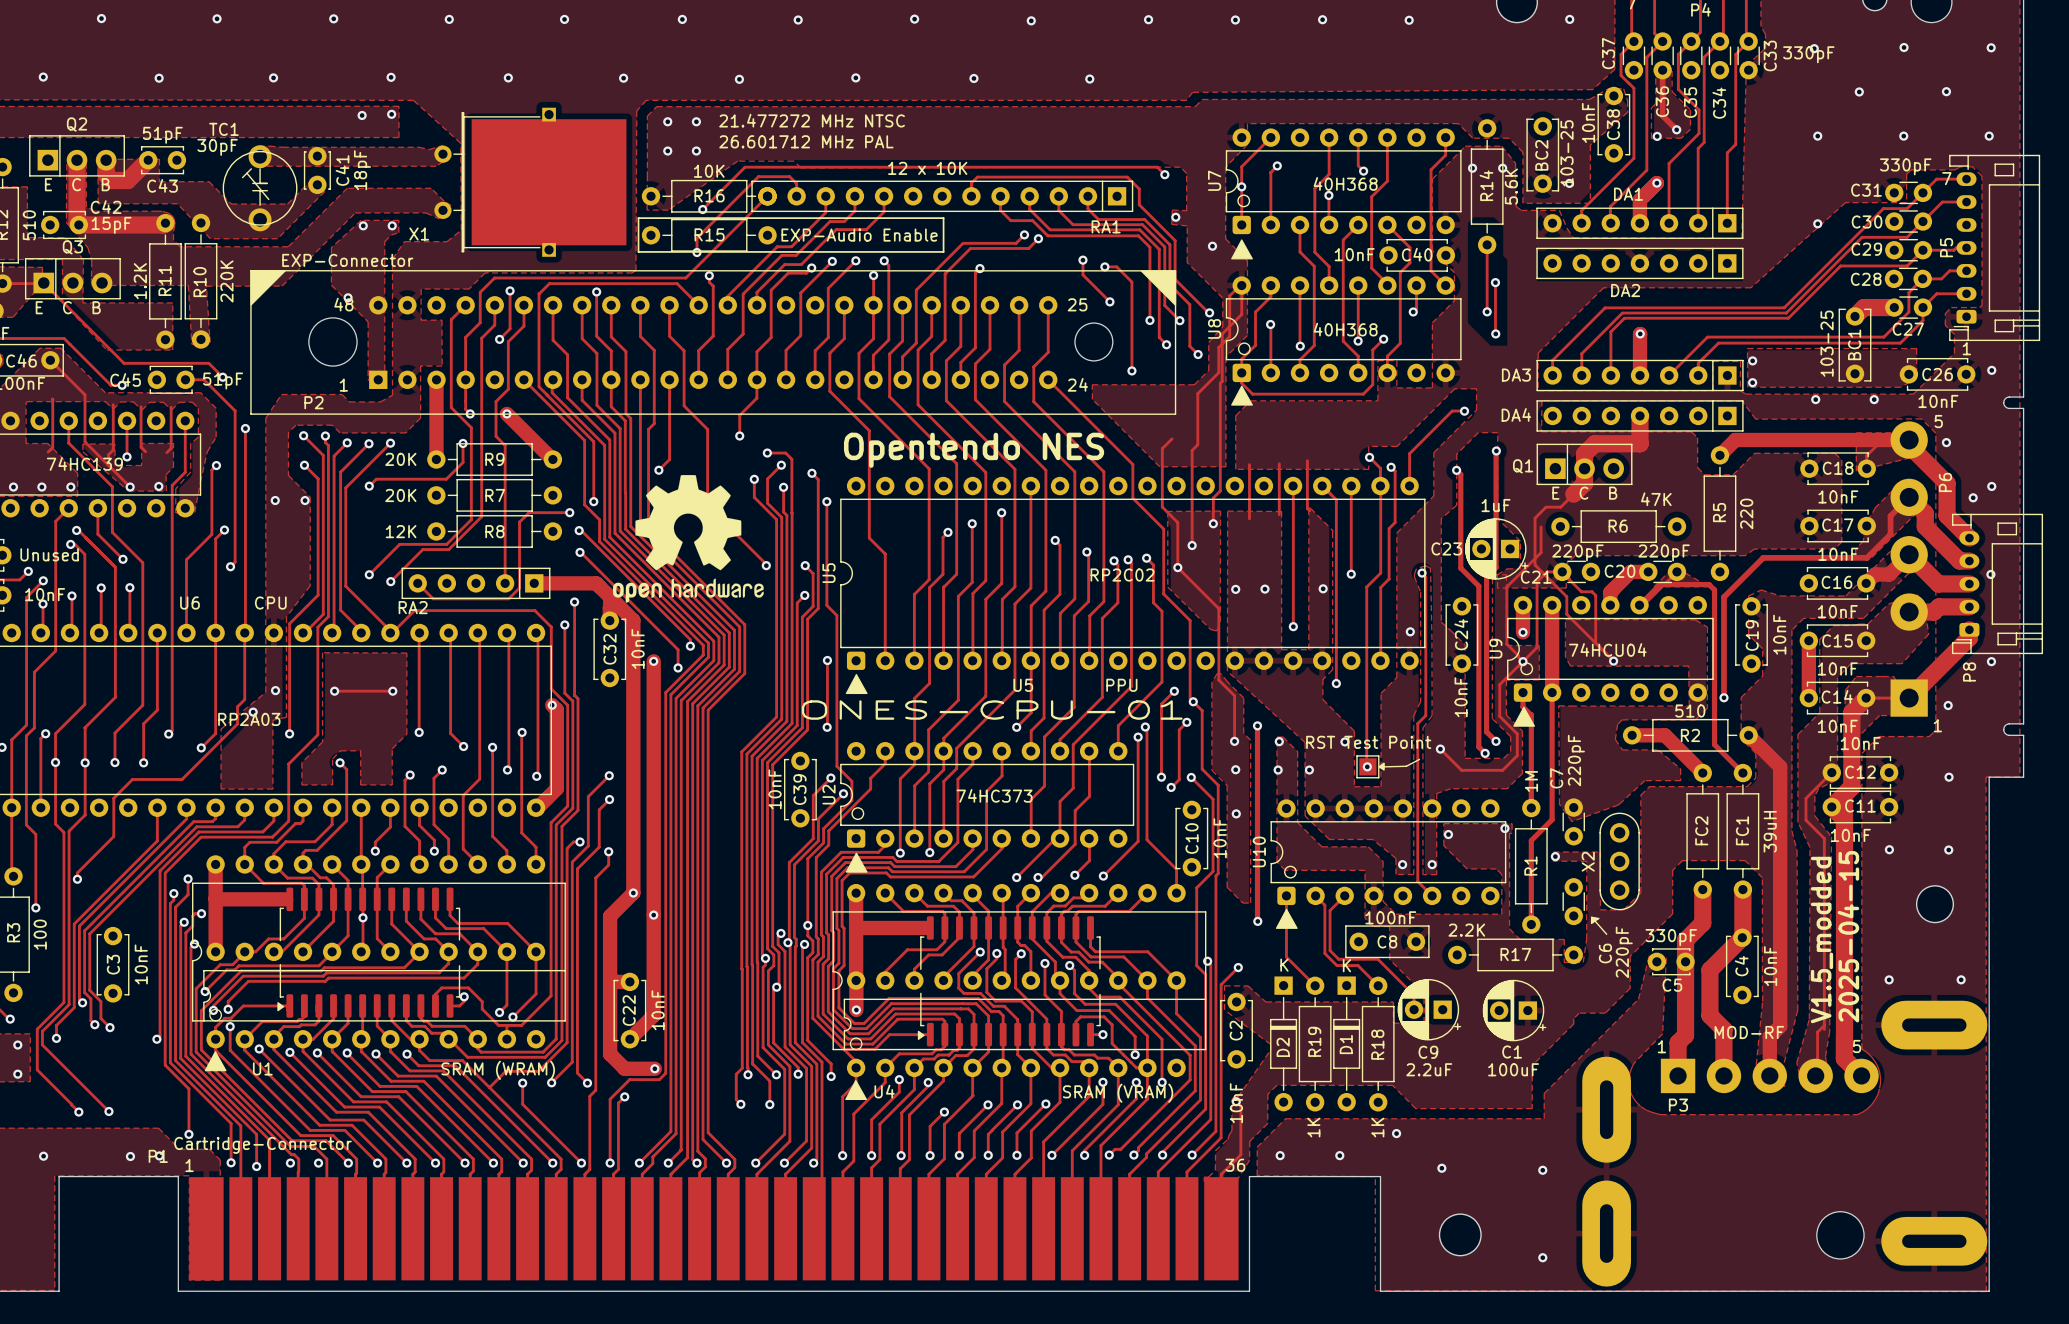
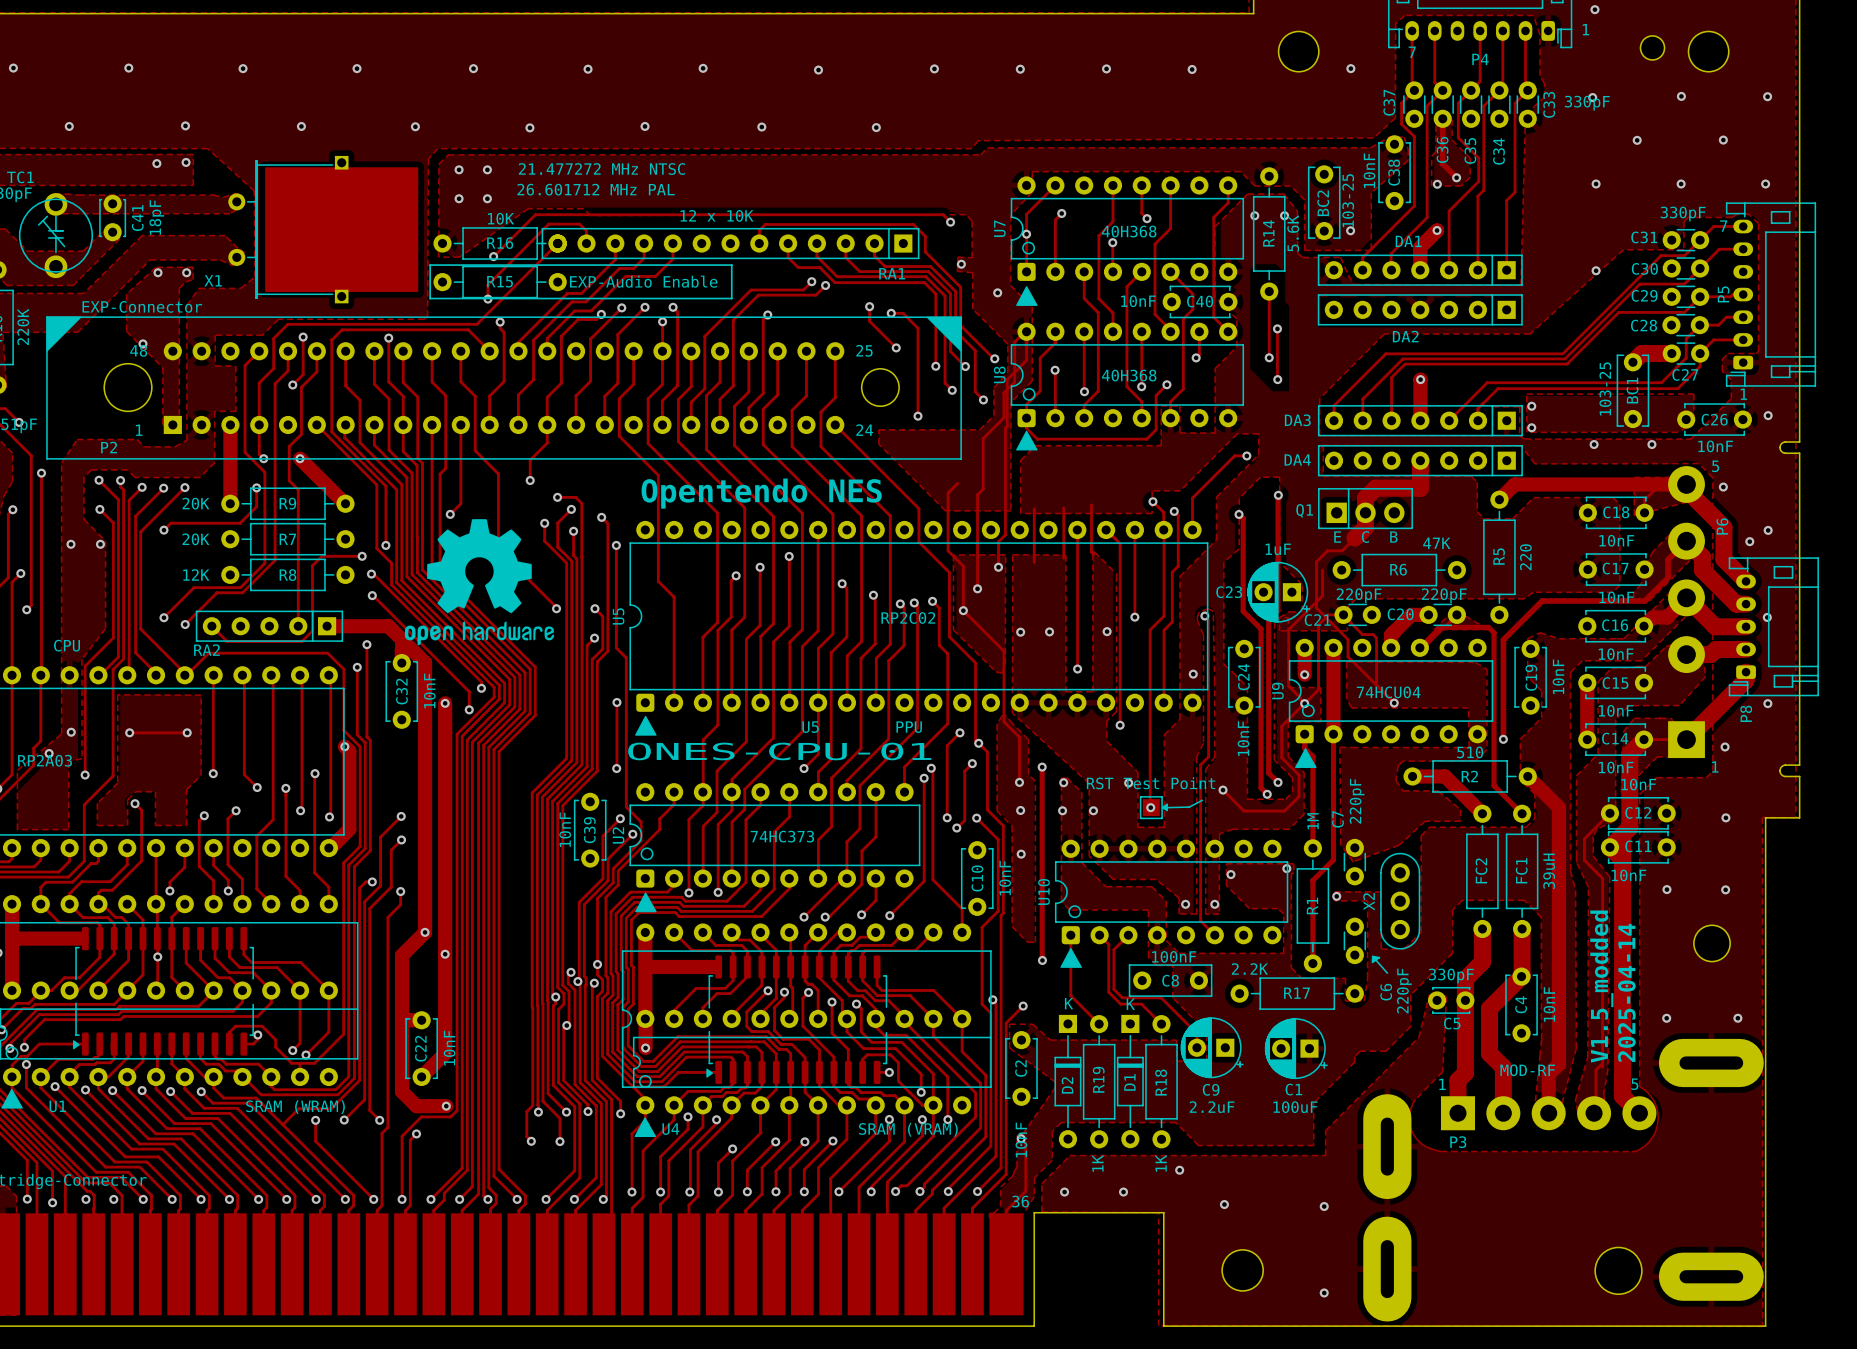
text: 2025-04-15 (1848, 936) -> 2025-04-14 (1626, 992)

